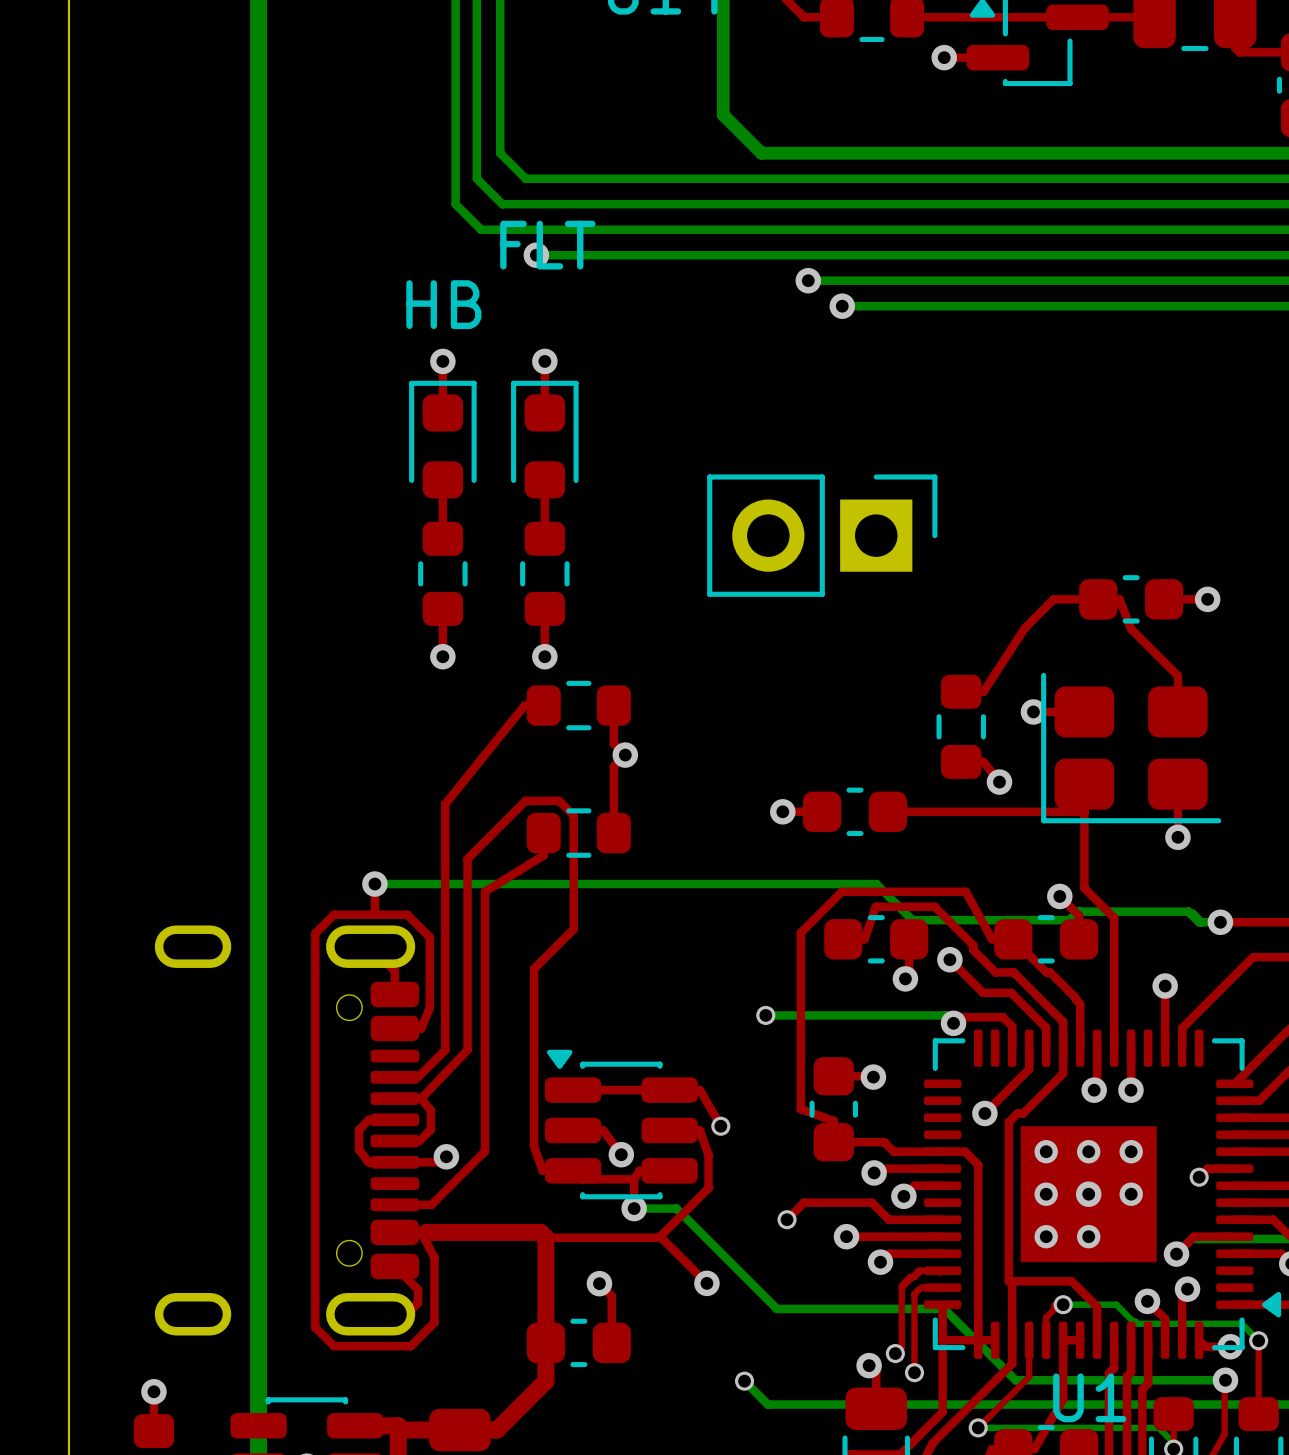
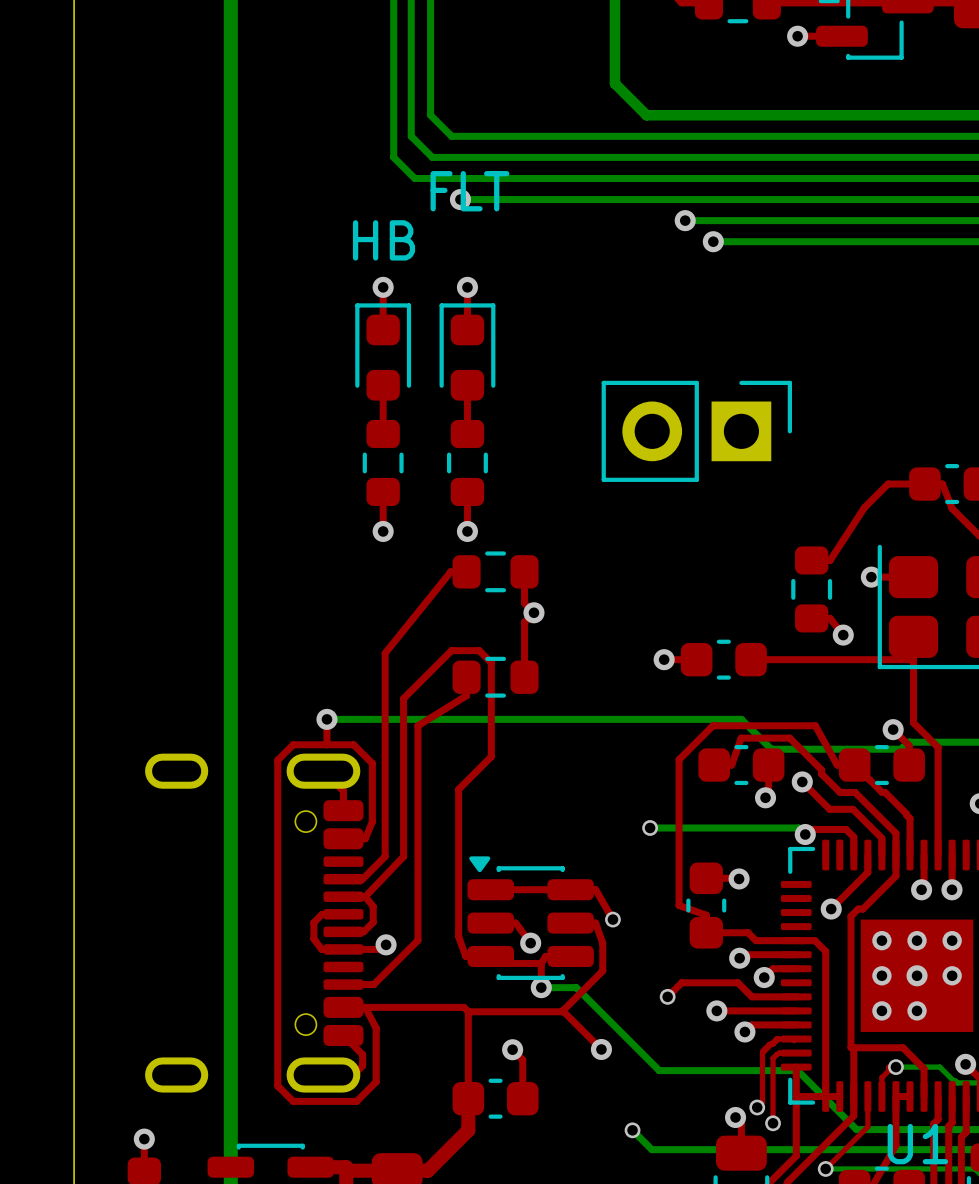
top track width: thick (425, 1232) (540, 1232) (545, 1237) (545, 1342) -> thin (369, 1007) (463, 1007) (468, 1011) (468, 1098)

